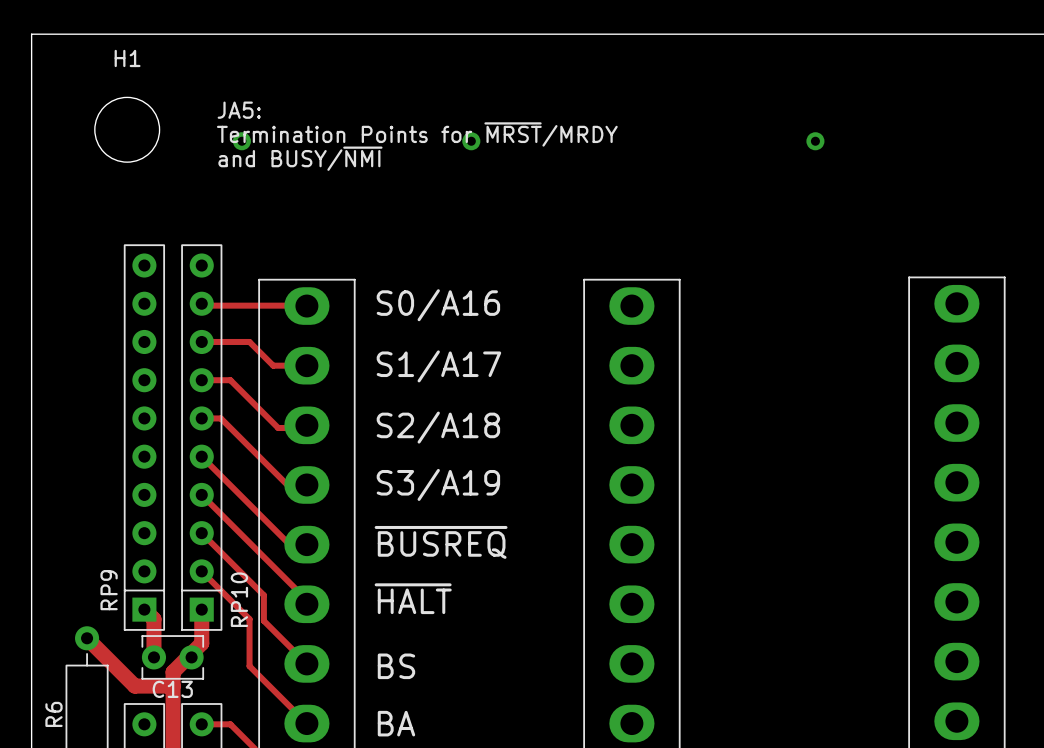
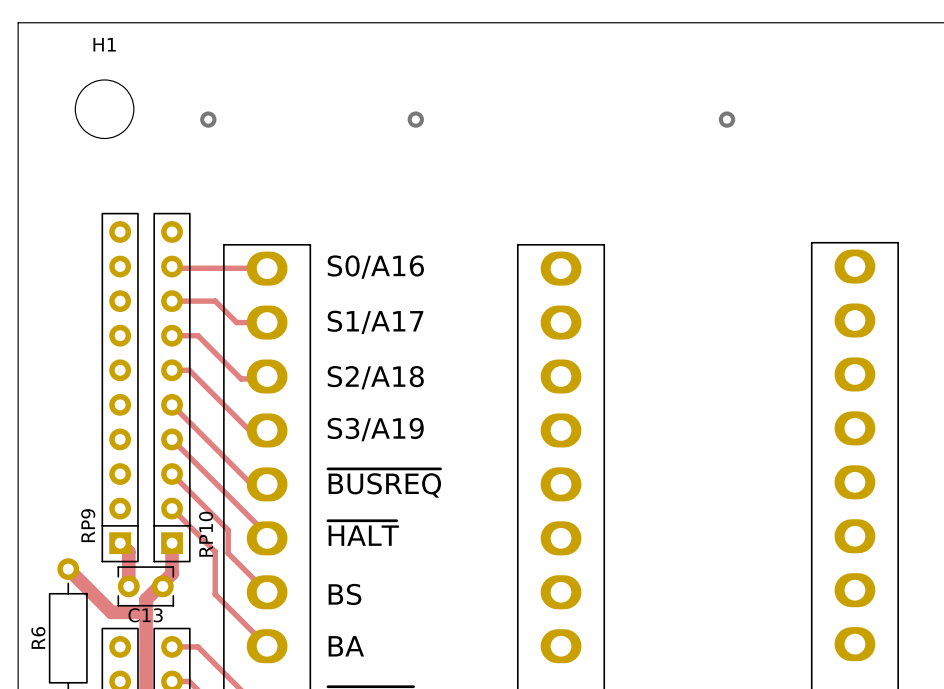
text: JA5: (239, 110) -> none
text: Termination Points for ~{MRST}/MRDY (417, 134) -> none
text: and BUSY/~{NMI} (300, 158) -> none

